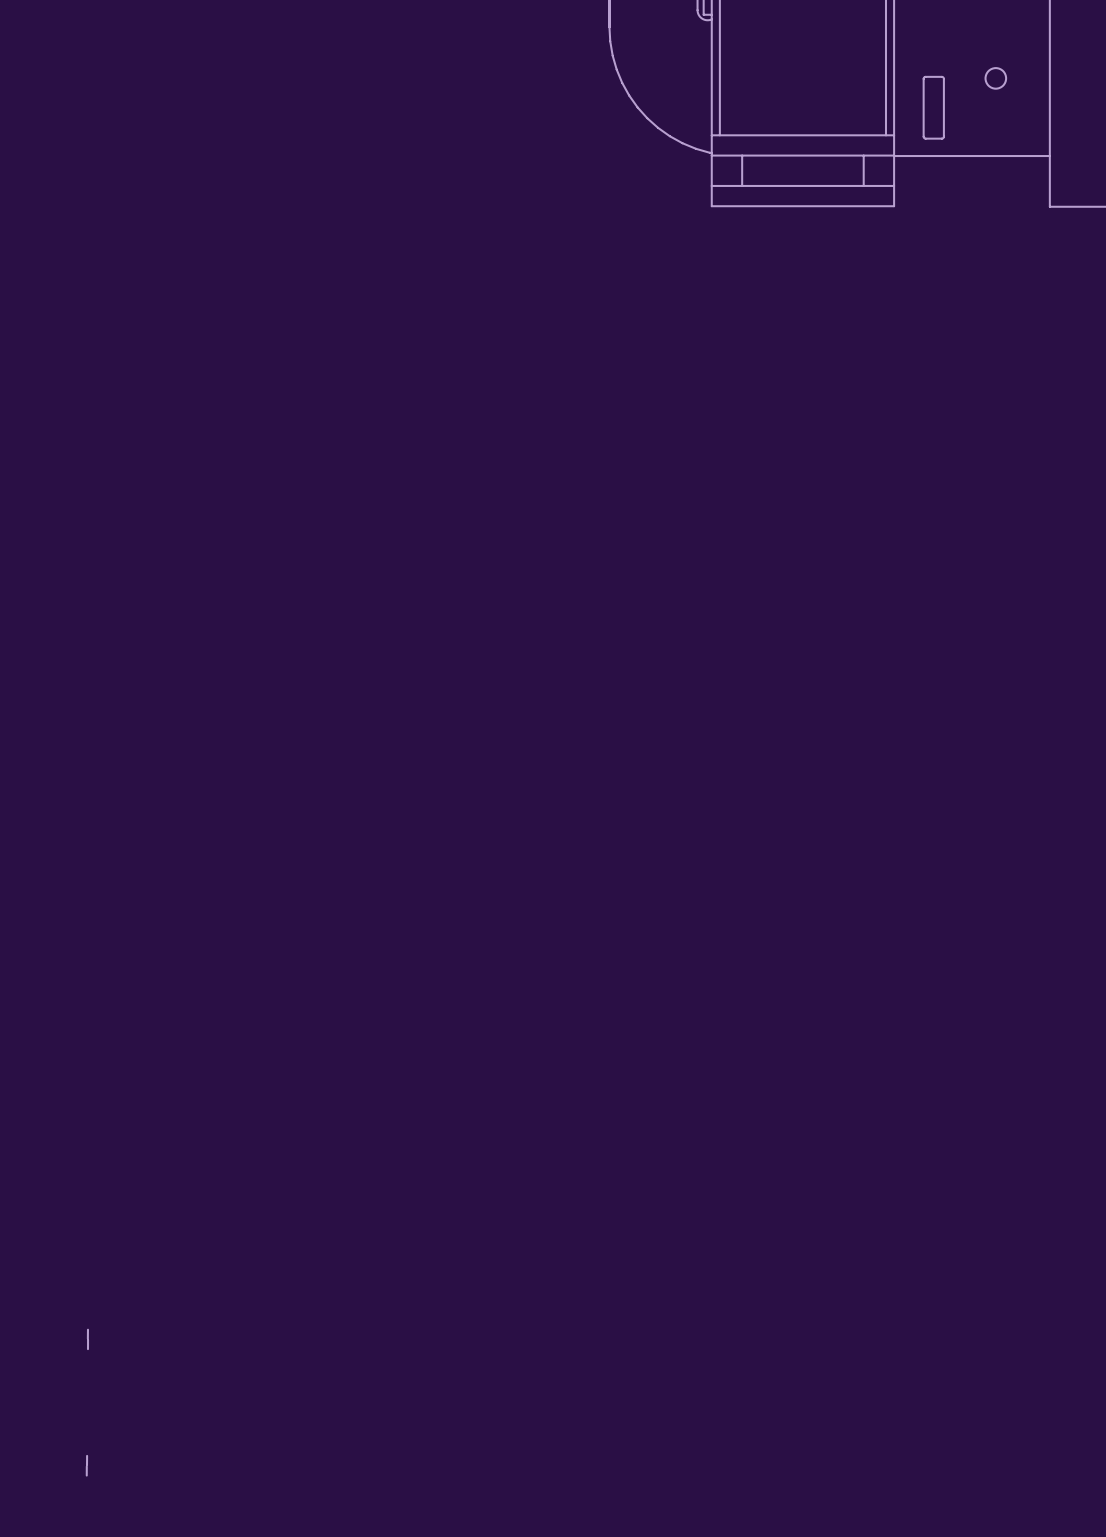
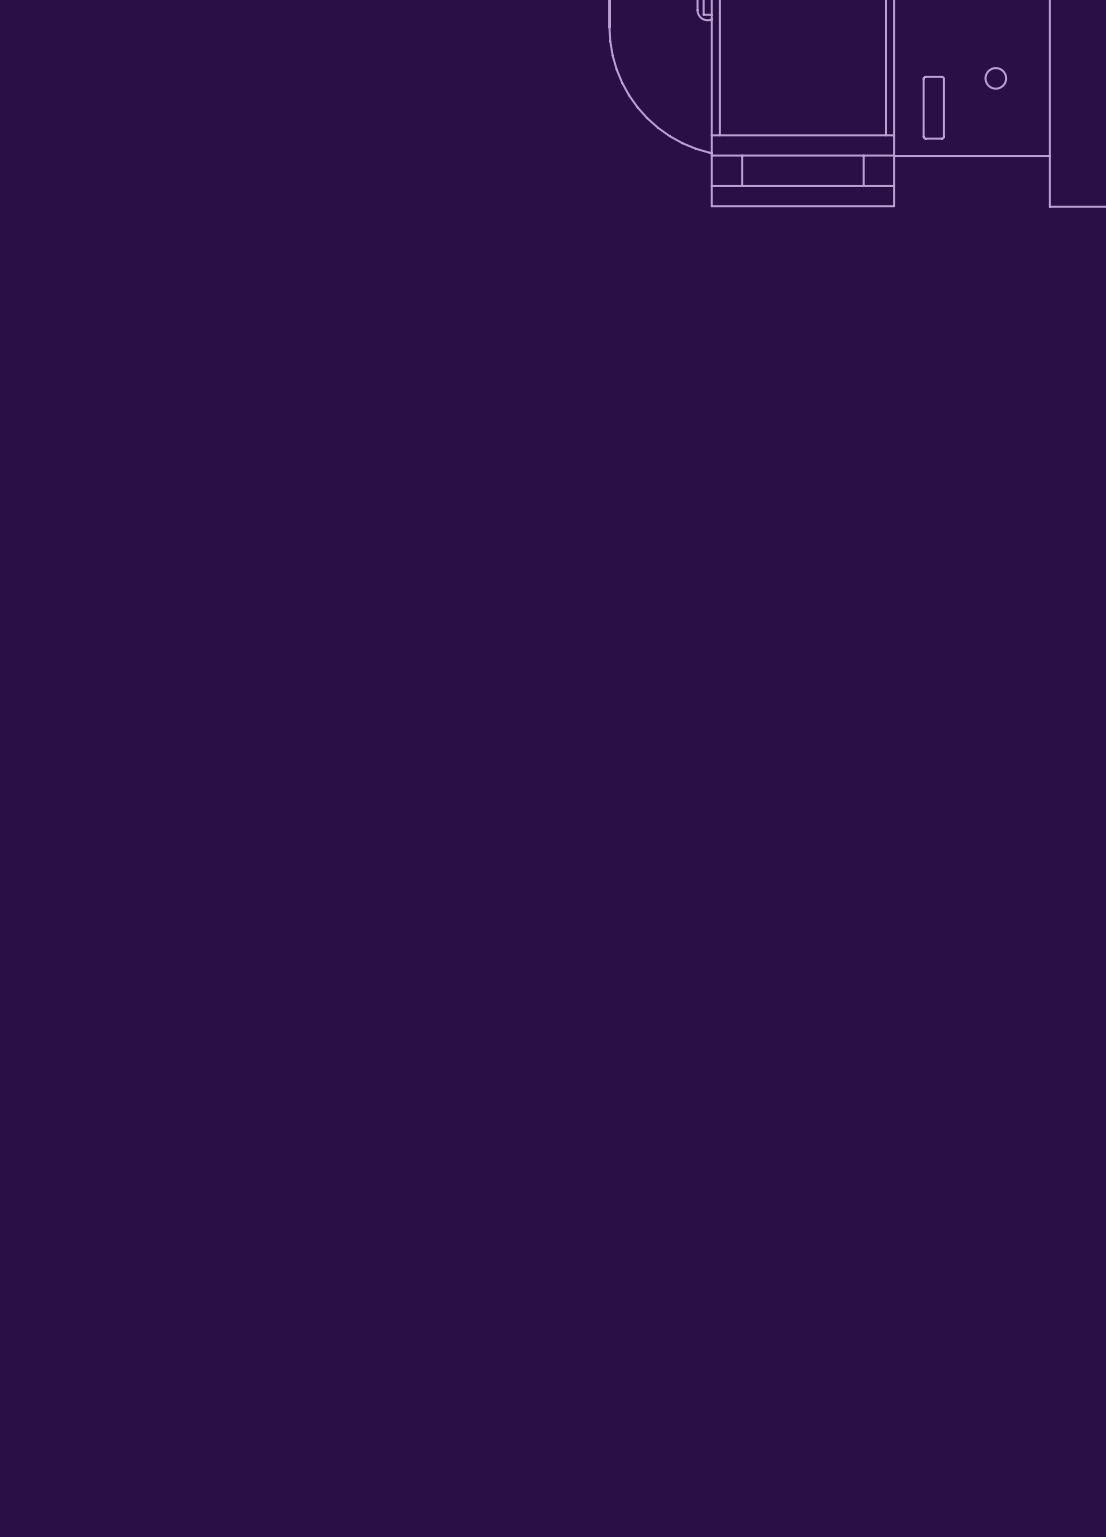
line: (87, 1329) (87, 1338) -> none
line: (88, 1340) (87, 1349) -> none
line: (87, 1455) (86, 1465) -> none
line: (86, 1466) (86, 1475) -> none

